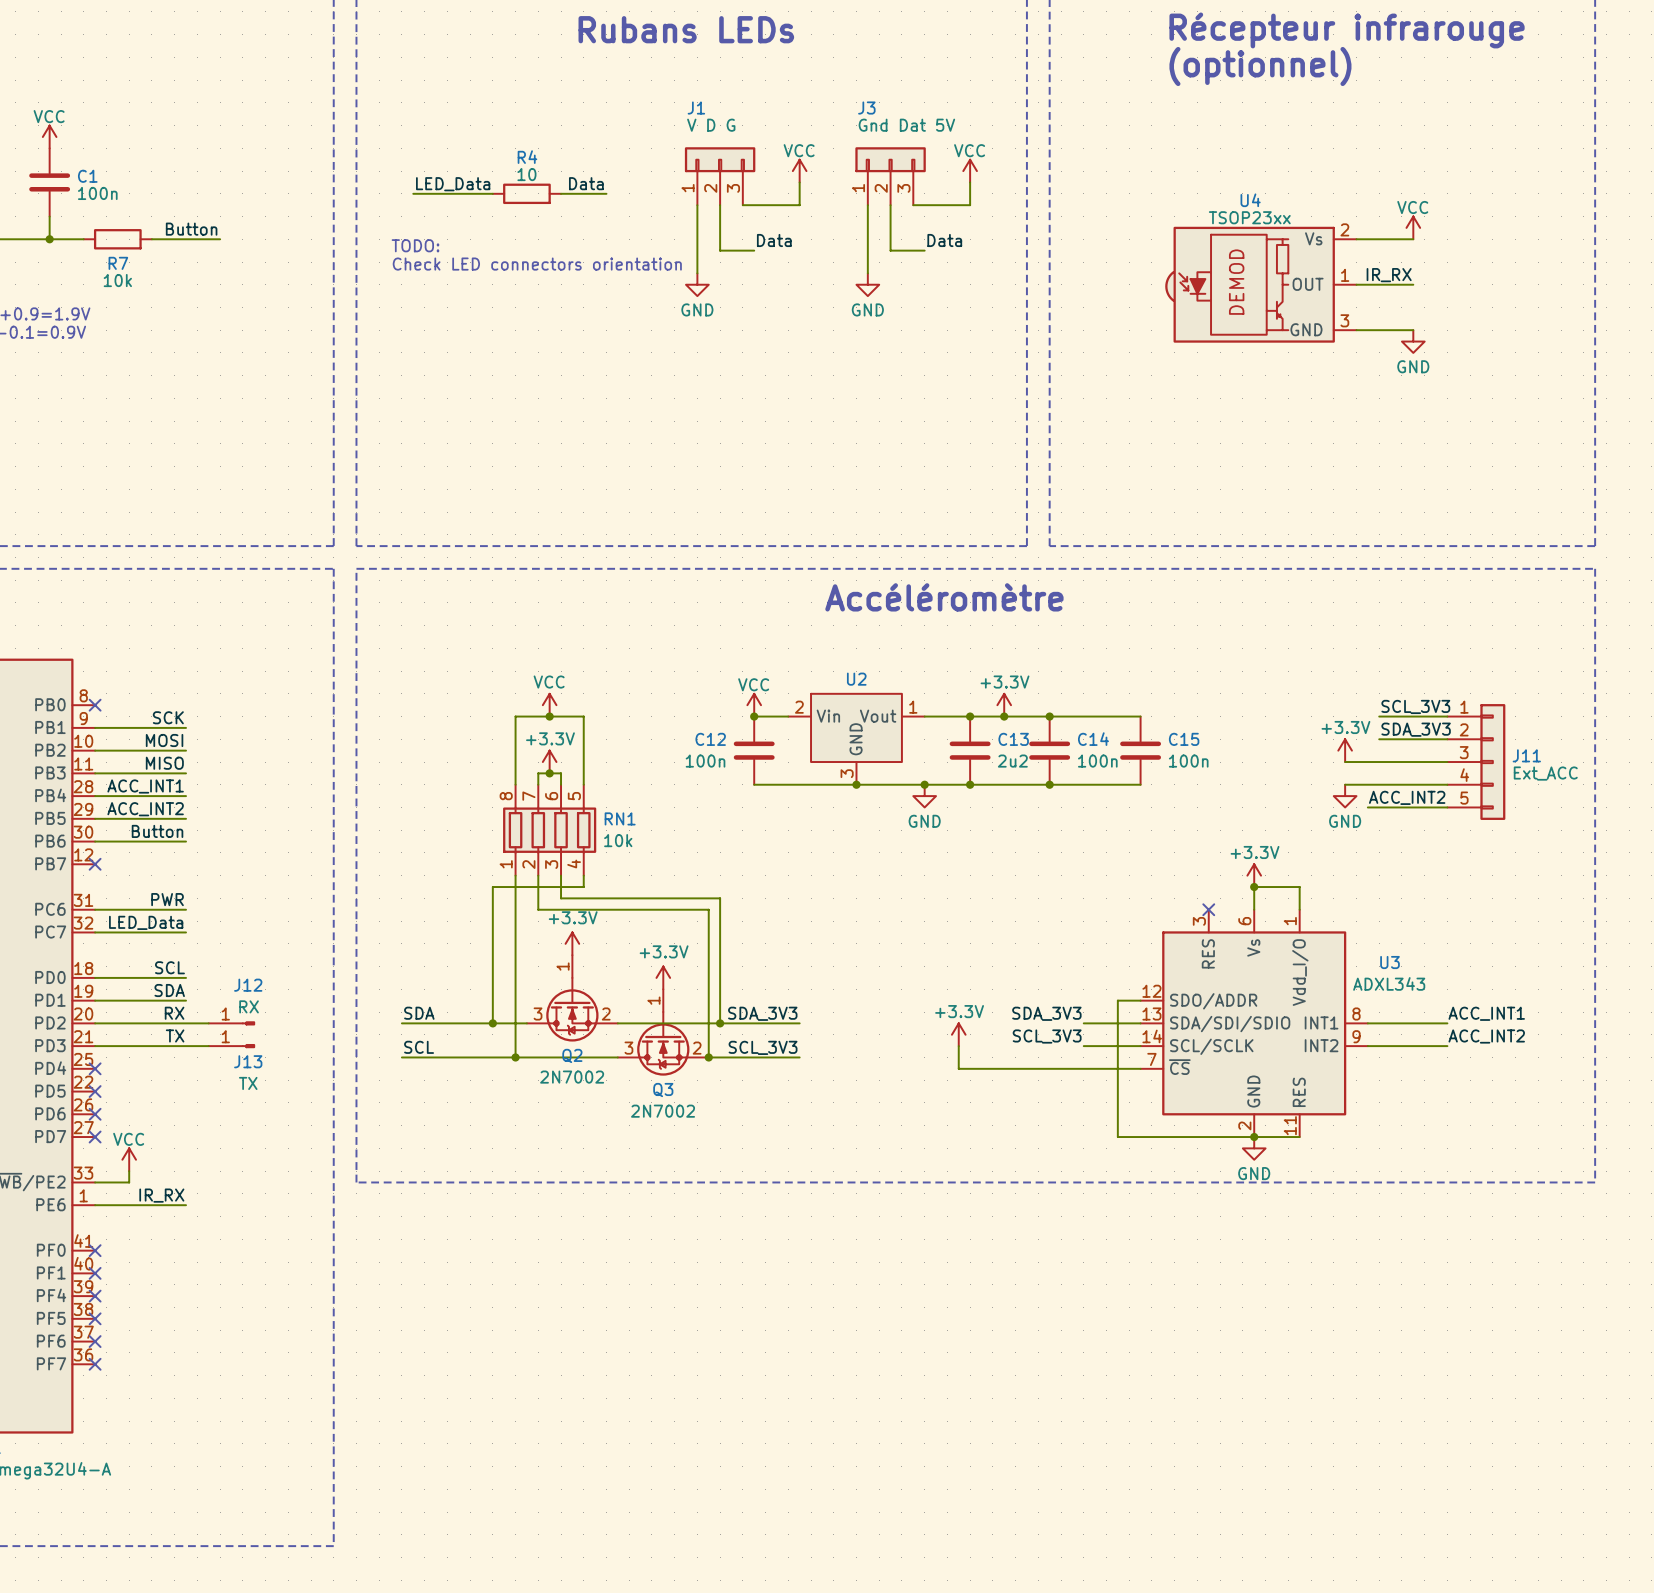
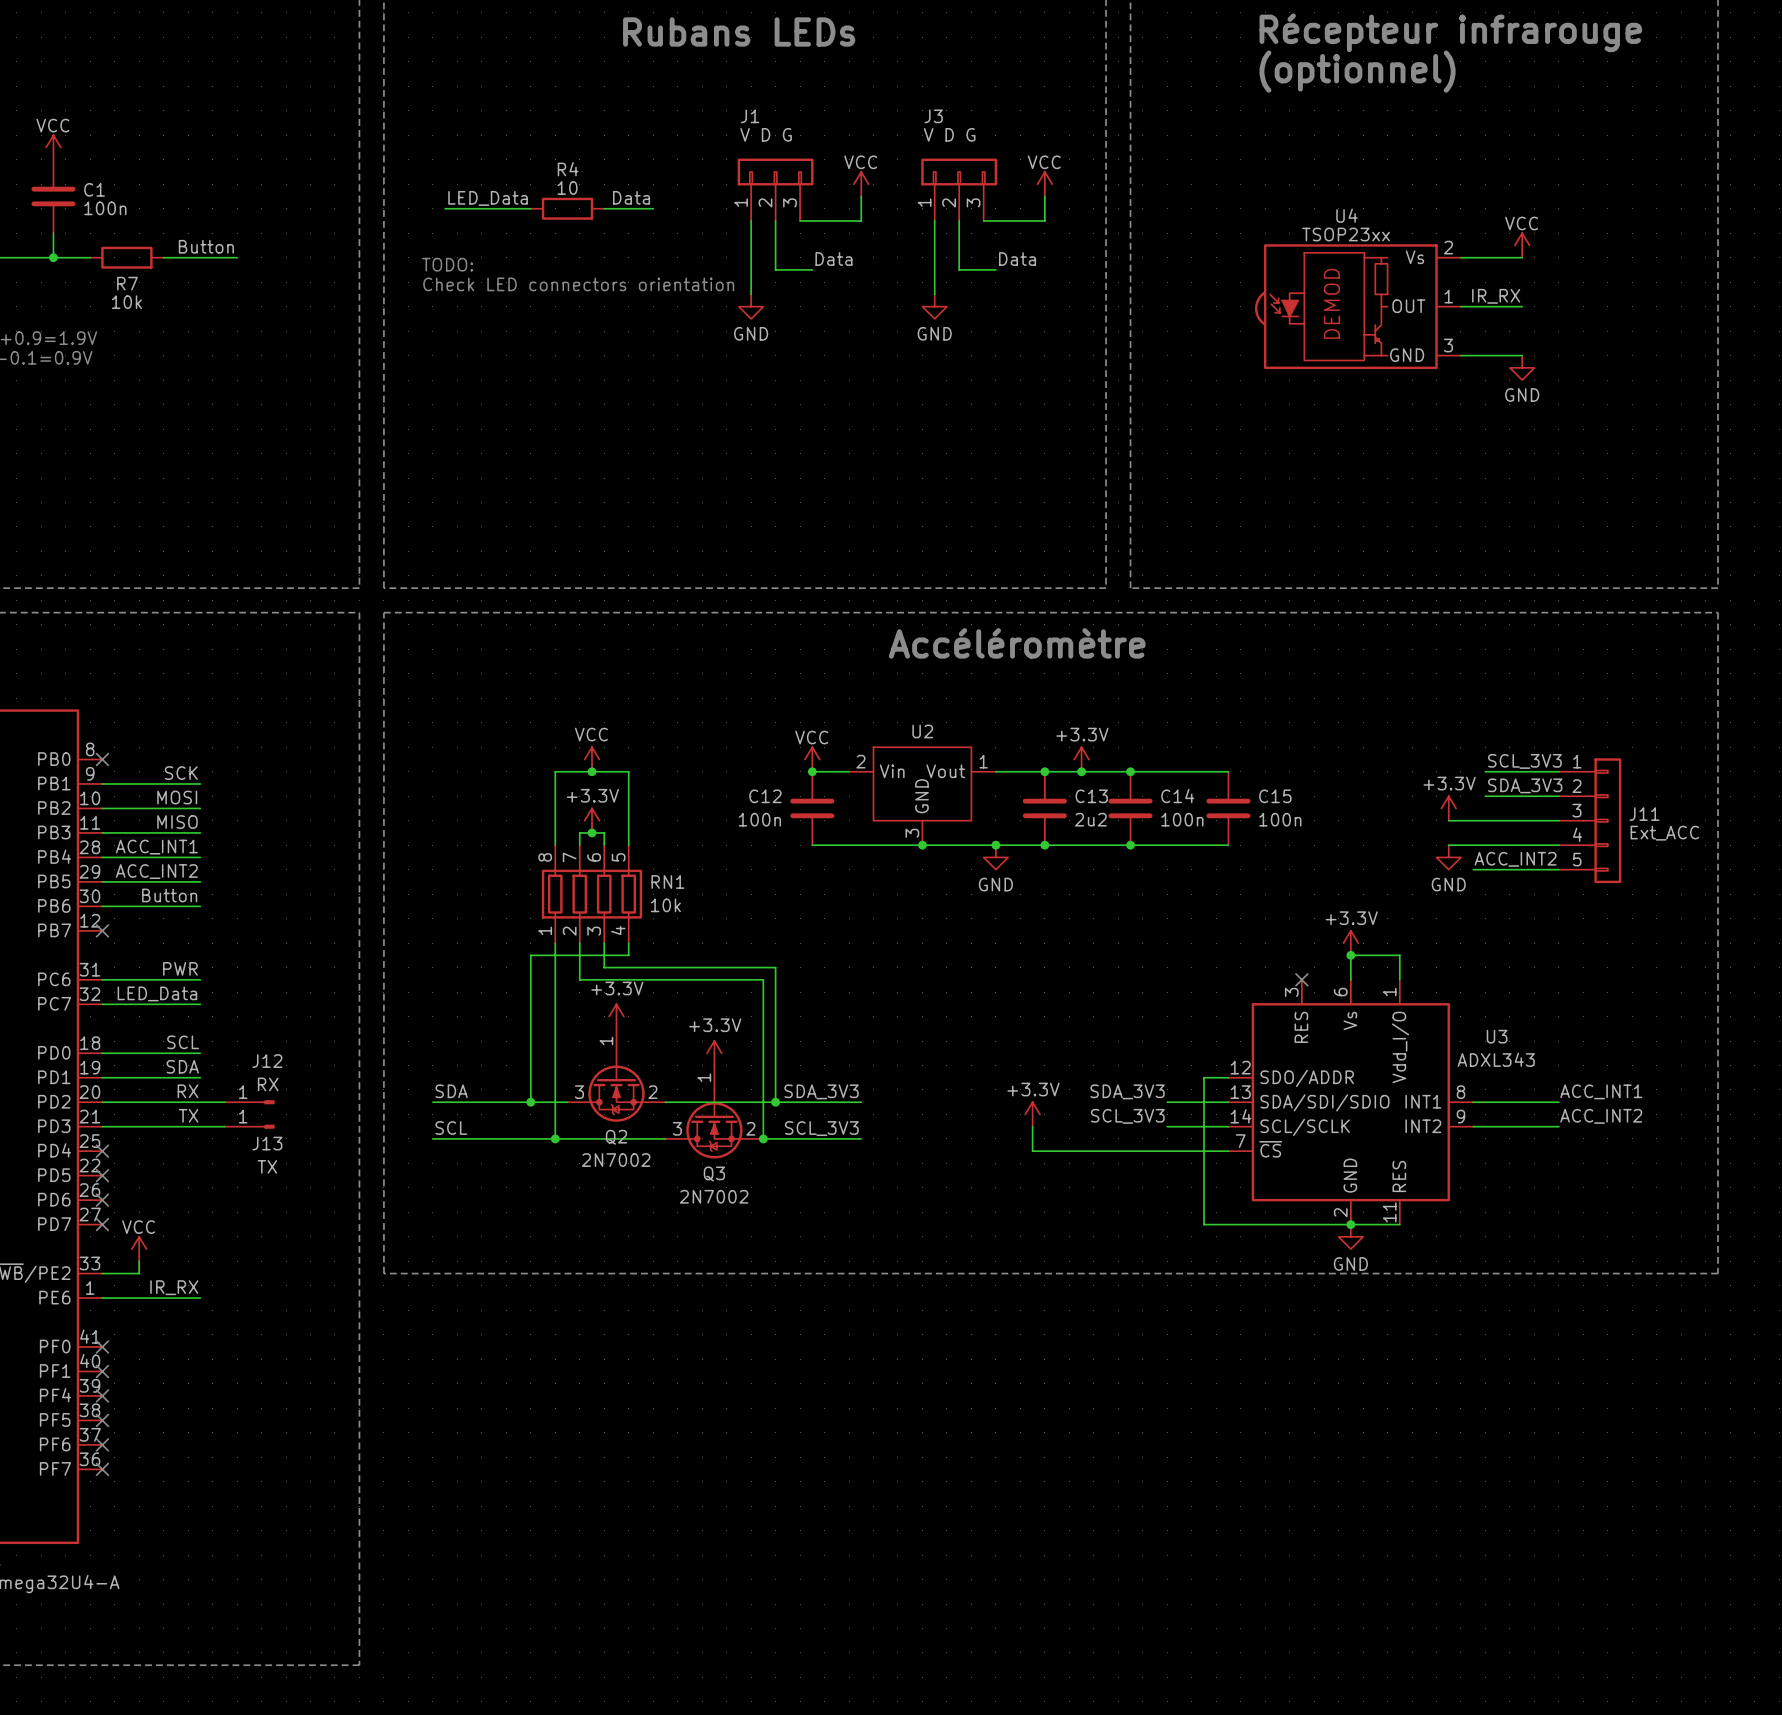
J3 value: Gnd Dat 5V (906, 125) -> V D G (949, 134)

